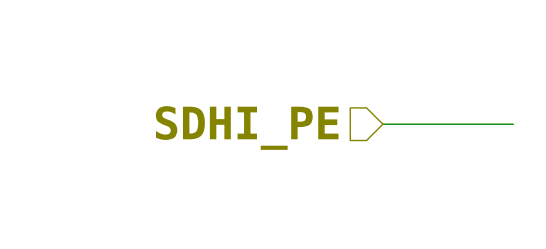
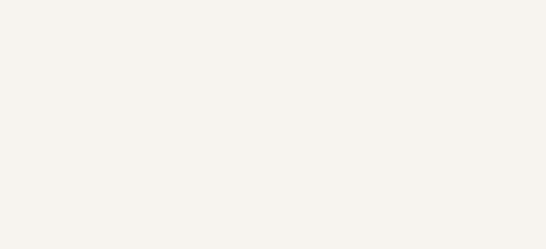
wire: (382, 124) (513, 124) -> none
hierarchical label: SDHI_PE (247, 127) -> none

